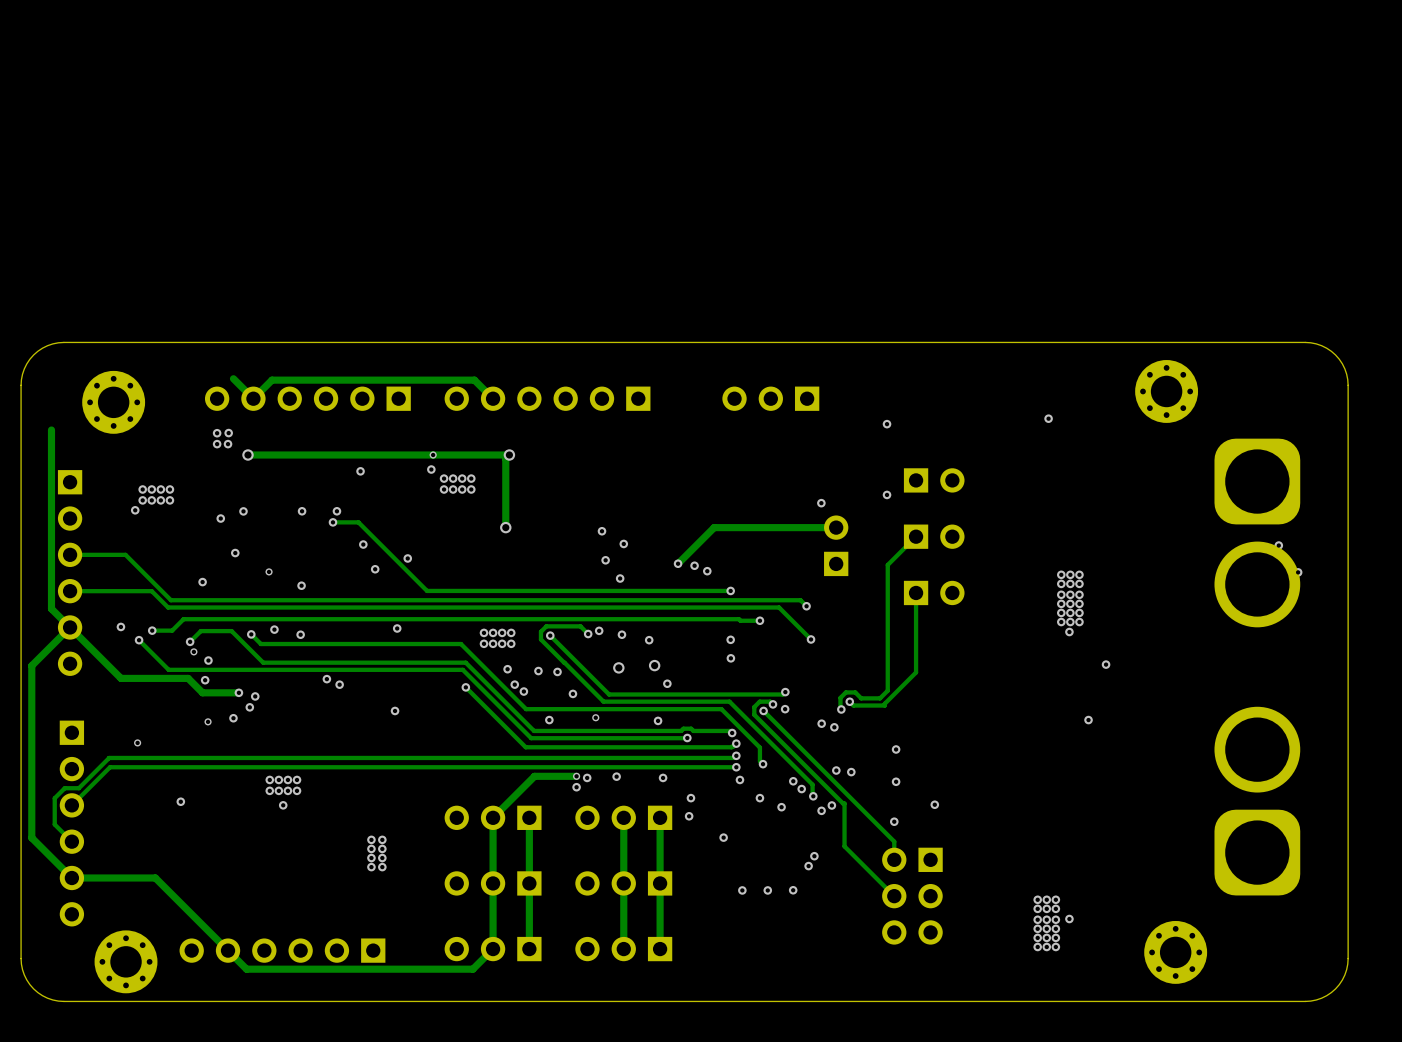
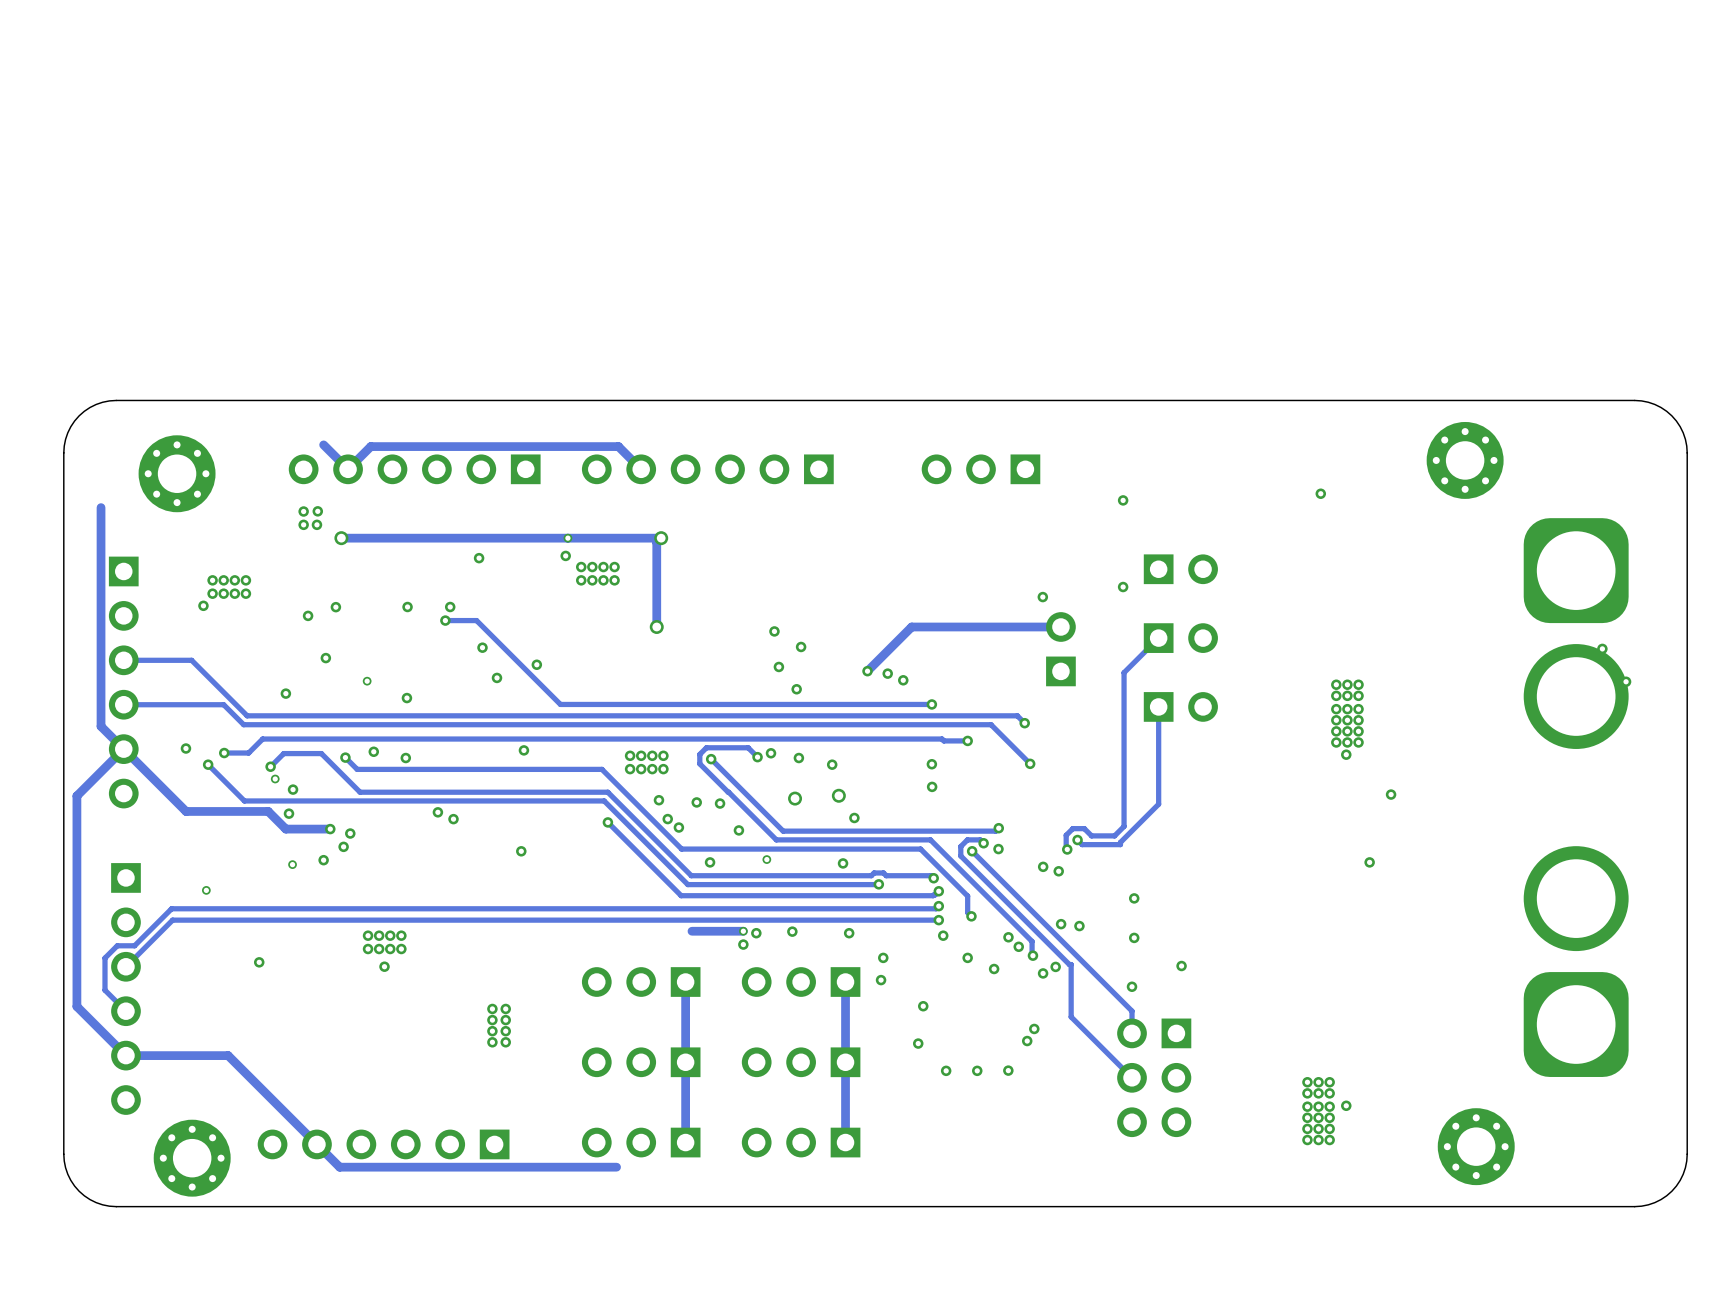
track: (534, 776) (493, 817) (493, 949) (472, 969) -> none
track: (623, 817) (623, 949) -> none
via: none -> (918, 1043)

